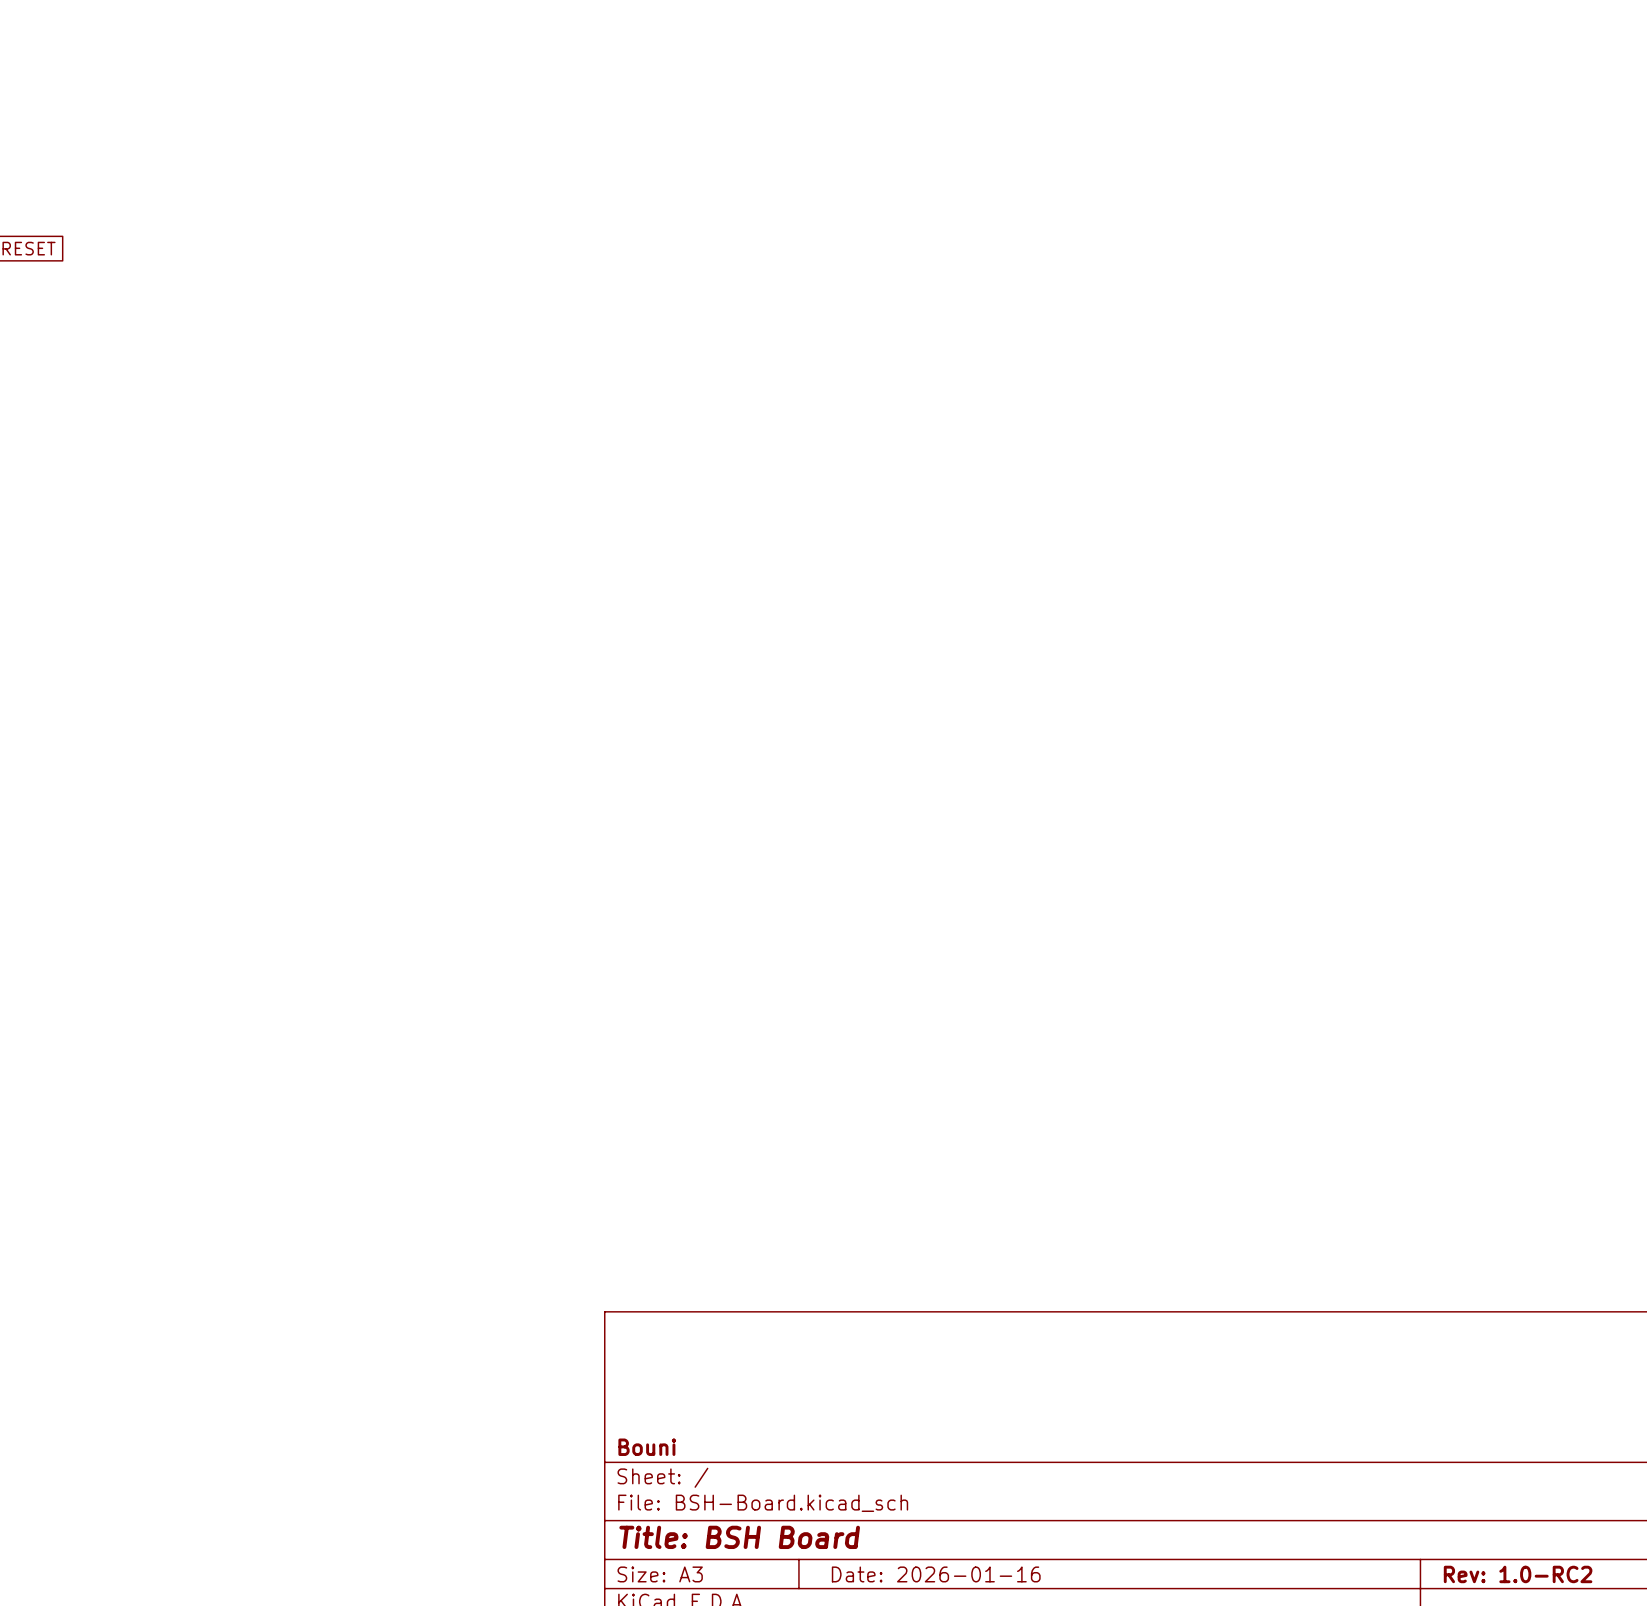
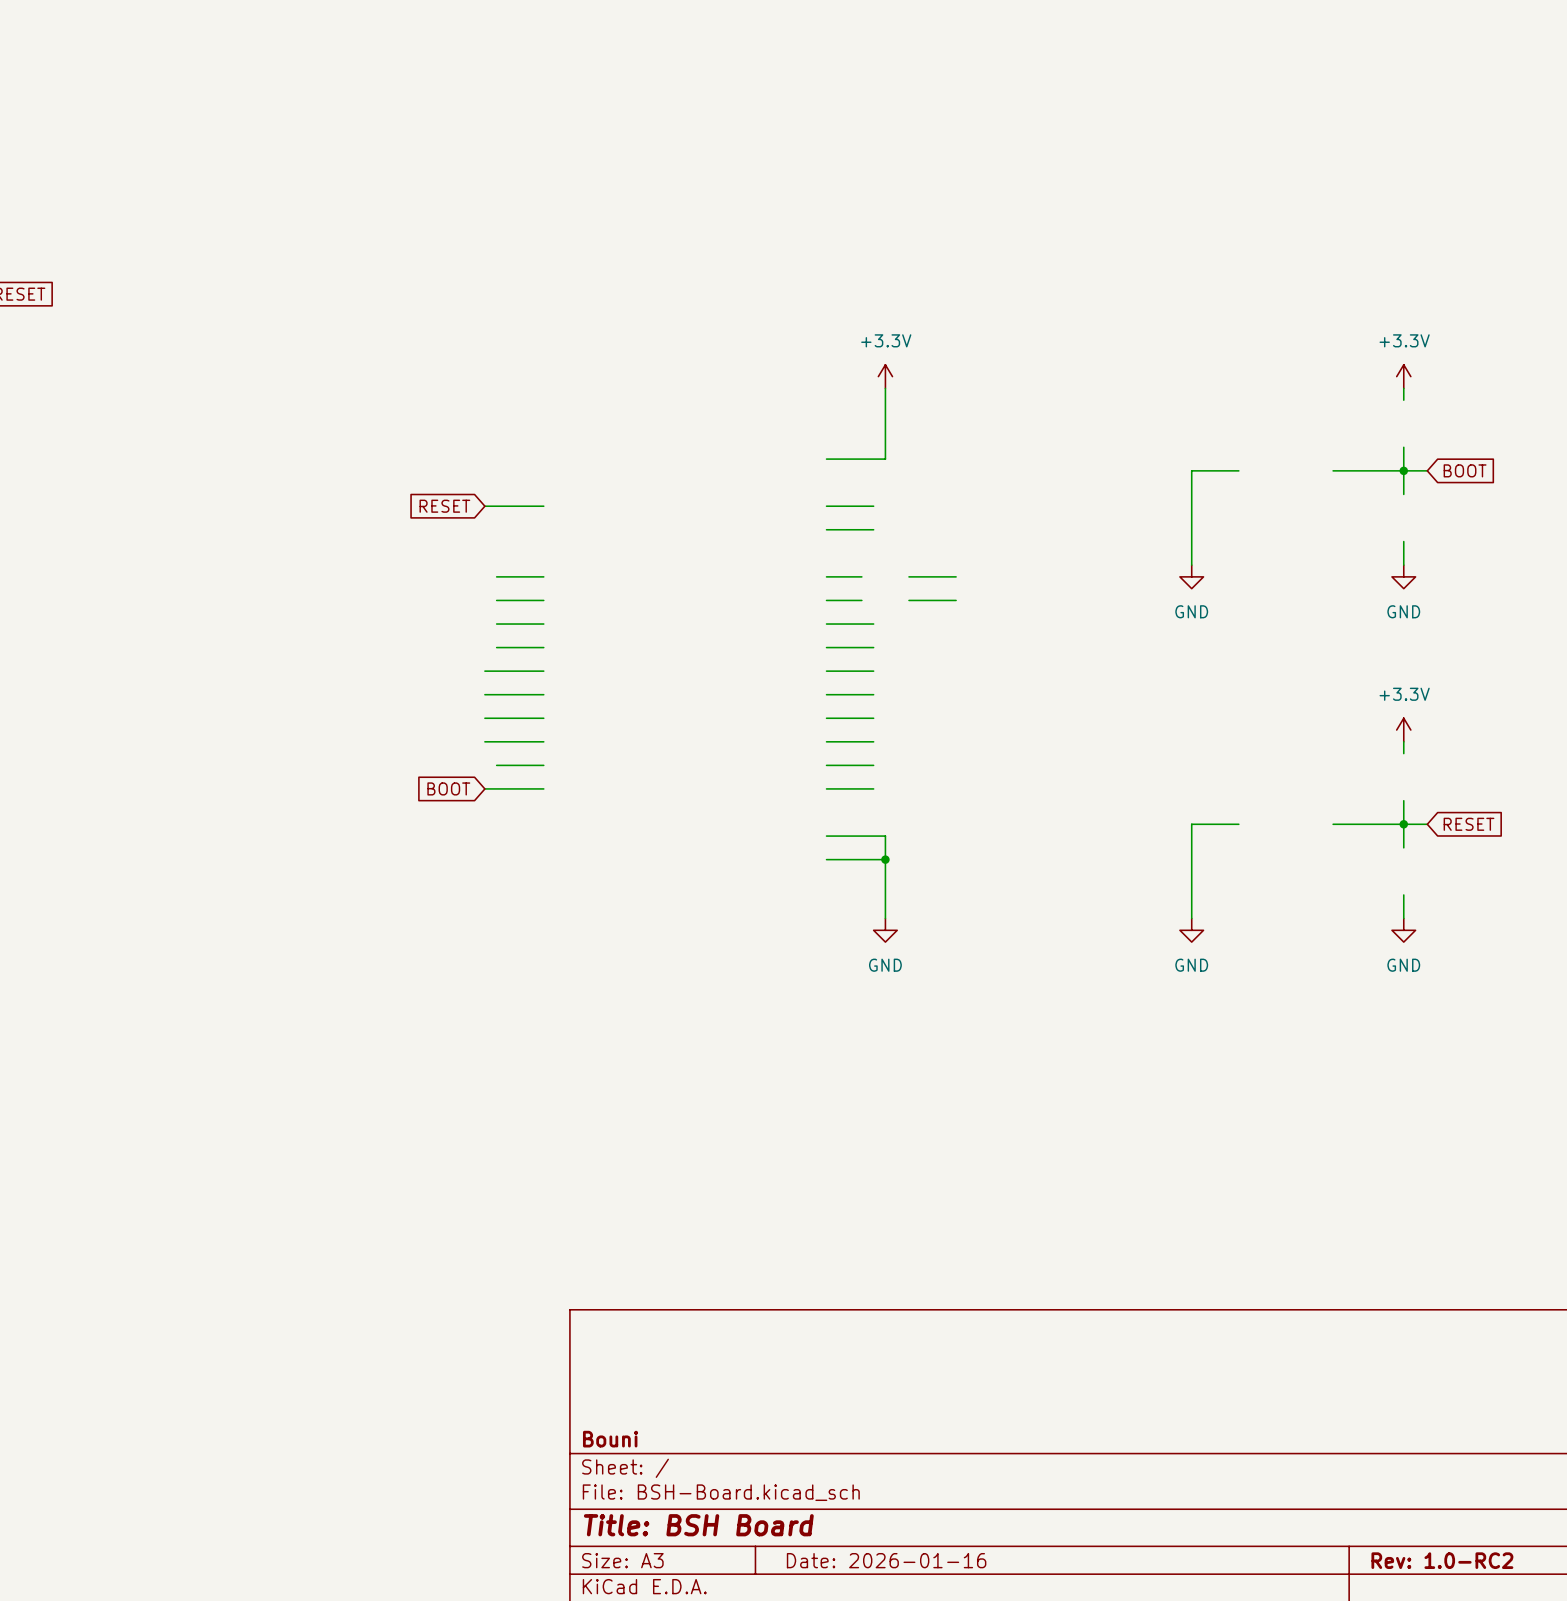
power symbol: none -> +3.3V (885, 376)
power symbol: none -> +3.3V (1403, 376)
wire: none -> (885, 388) (885, 459) (826, 459)
wire: none -> (1403, 388) (1403, 400)
wire: none -> (1403, 447) (1403, 494)
wire: none -> (1238, 470) (1191, 470) (1191, 565)
wire: none -> (1333, 470) (1427, 470)
junction: none -> (1403, 470)
global label: none -> BOOT (1465, 470)
global label: none -> RESET (444, 506)
wire: none -> (484, 506) (543, 506)
wire: none -> (826, 506) (873, 506)
wire: none -> (826, 529) (873, 529)
wire: none -> (1403, 541) (1403, 565)
wire: none -> (496, 576) (543, 576)
wire: none -> (826, 576) (861, 576)
wire: none -> (908, 576) (956, 576)
power symbol: none -> GND (1191, 576)
power symbol: none -> GND (1403, 576)
wire: none -> (496, 600) (543, 600)
wire: none -> (826, 600) (861, 600)
wire: none -> (908, 600) (956, 600)
wire: none -> (496, 624) (543, 624)
wire: none -> (826, 624) (873, 624)
wire: none -> (496, 647) (543, 647)
wire: none -> (826, 647) (873, 647)
wire: none -> (484, 671) (543, 671)
wire: none -> (826, 671) (873, 671)
wire: none -> (484, 694) (543, 694)
wire: none -> (826, 694) (873, 694)
wire: none -> (484, 718) (543, 718)
wire: none -> (826, 718) (873, 718)
power symbol: none -> +3.3V (1403, 730)
wire: none -> (484, 741) (543, 741)
wire: none -> (826, 741) (873, 741)
wire: none -> (1403, 741) (1403, 753)
wire: none -> (496, 765) (543, 765)
wire: none -> (826, 765) (873, 765)
global label: none -> BOOT (448, 788)
wire: none -> (484, 788) (543, 788)
wire: none -> (826, 788) (873, 788)
wire: none -> (1403, 800) (1403, 847)
wire: none -> (1238, 824) (1191, 824) (1191, 918)
wire: none -> (1333, 824) (1427, 824)
junction: none -> (1403, 824)
global label: none -> RESET (1469, 824)
wire: none -> (826, 836) (885, 836) (885, 918)
wire: none -> (826, 859) (885, 859)
junction: none -> (885, 859)
wire: none -> (1403, 894) (1403, 918)
power symbol: none -> GND (885, 930)
power symbol: none -> GND (1191, 930)
power symbol: none -> GND (1403, 930)

